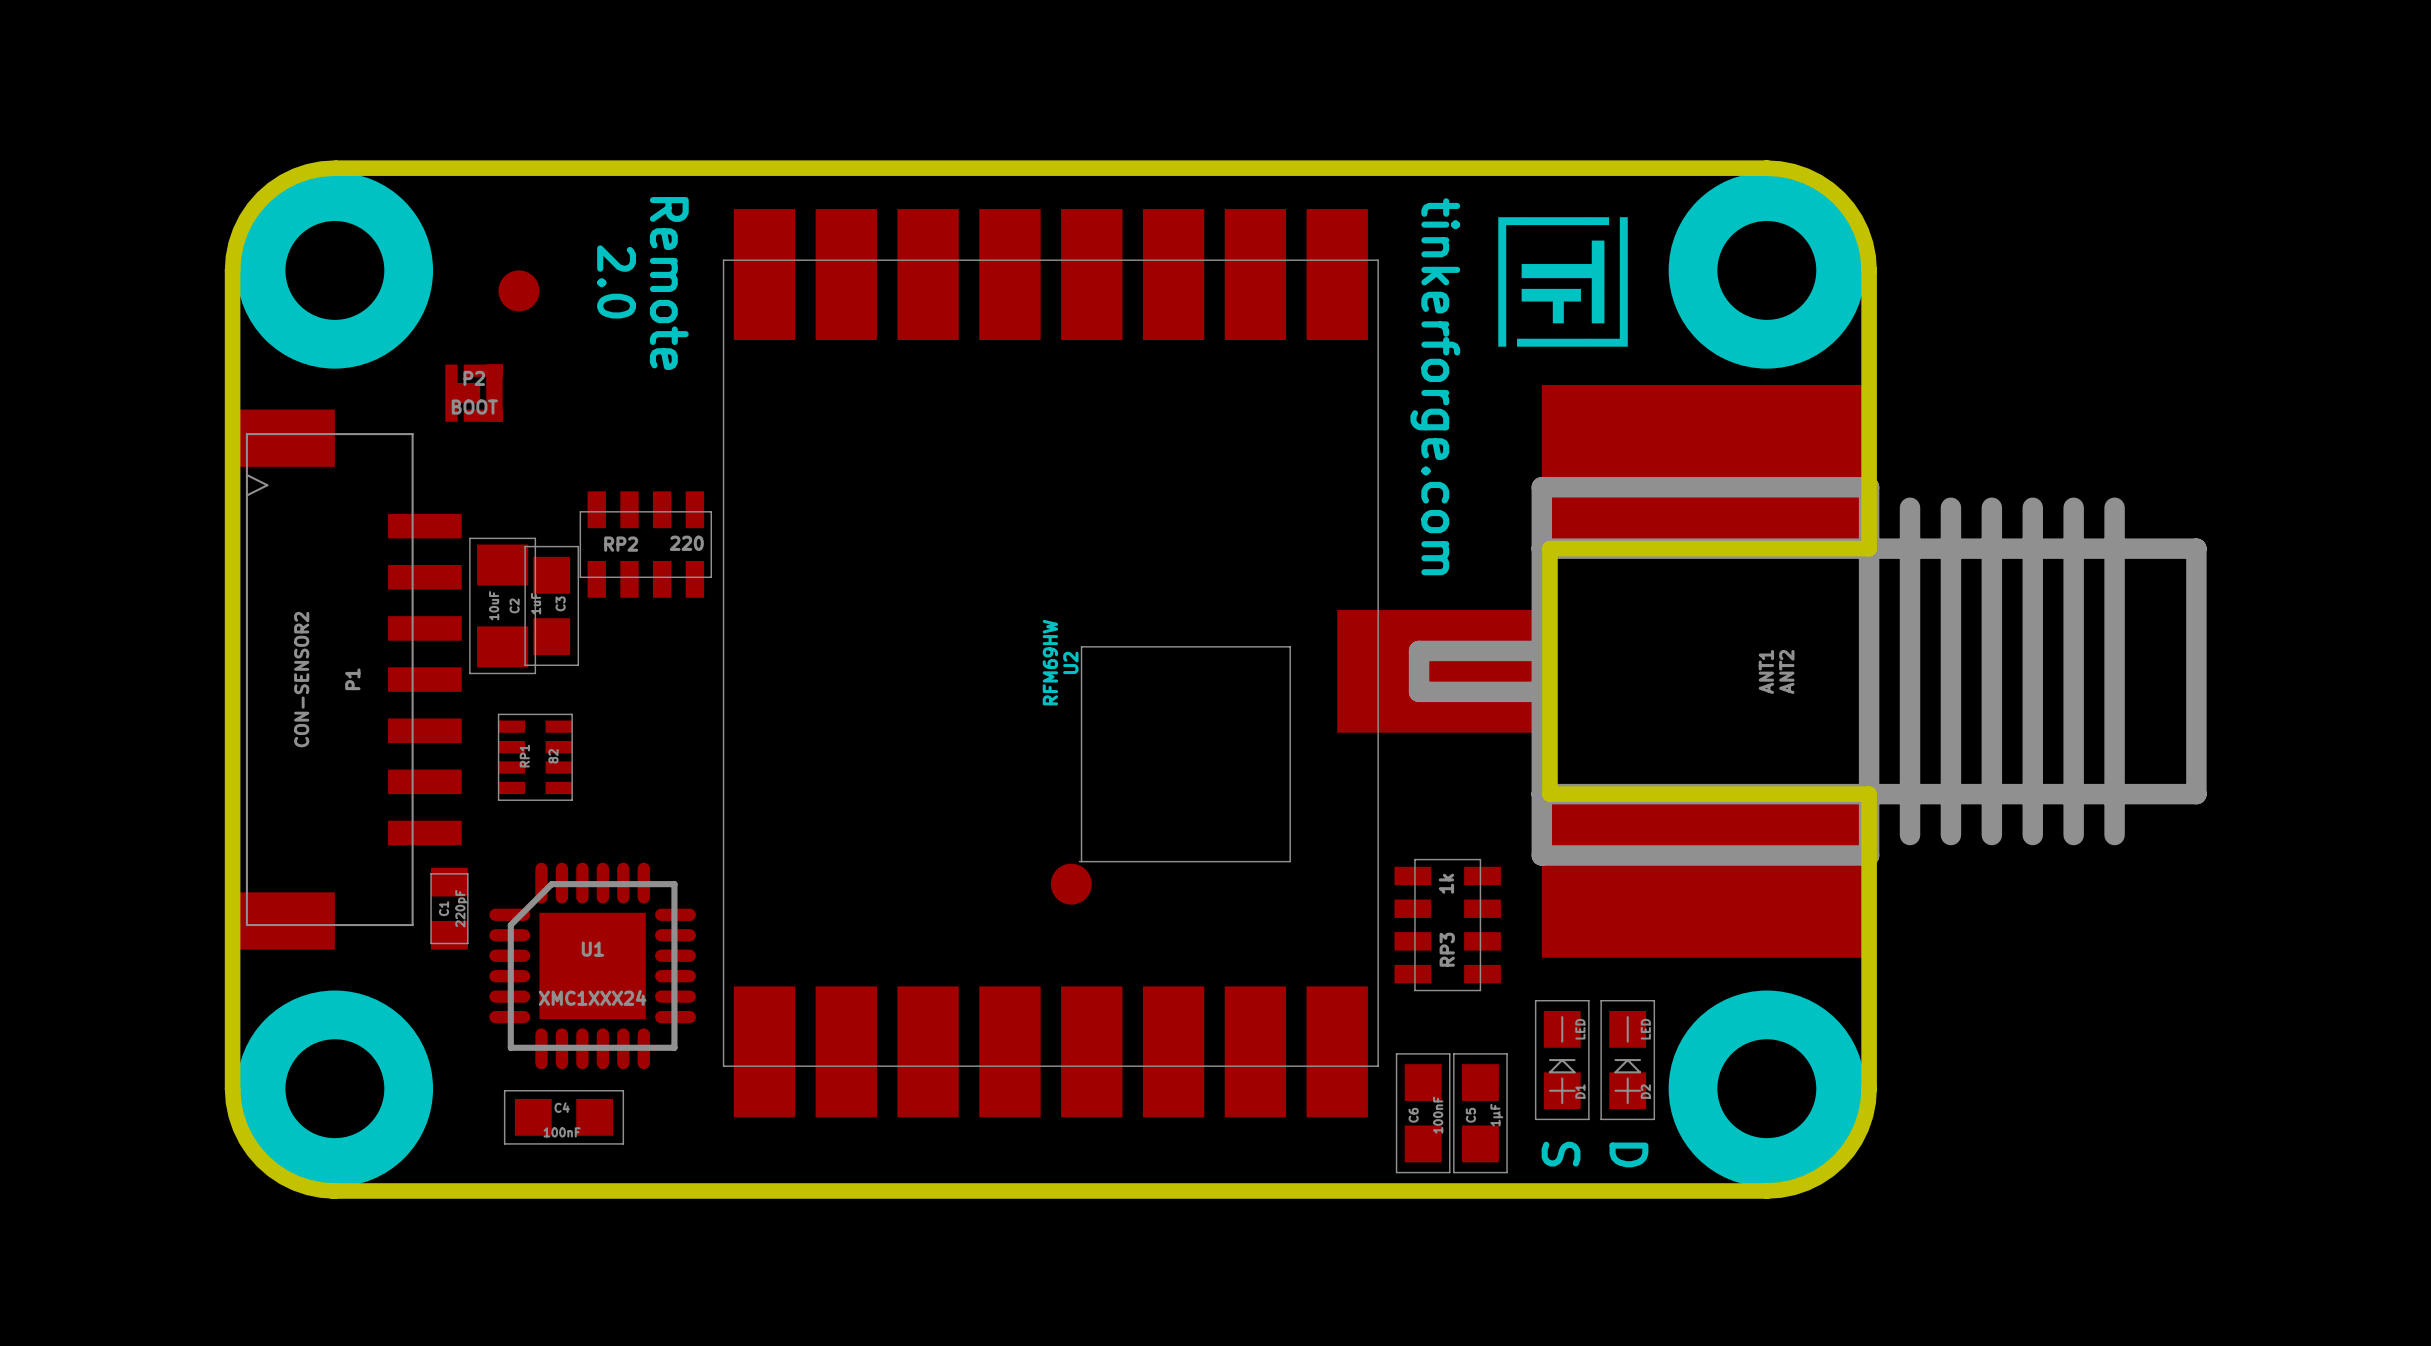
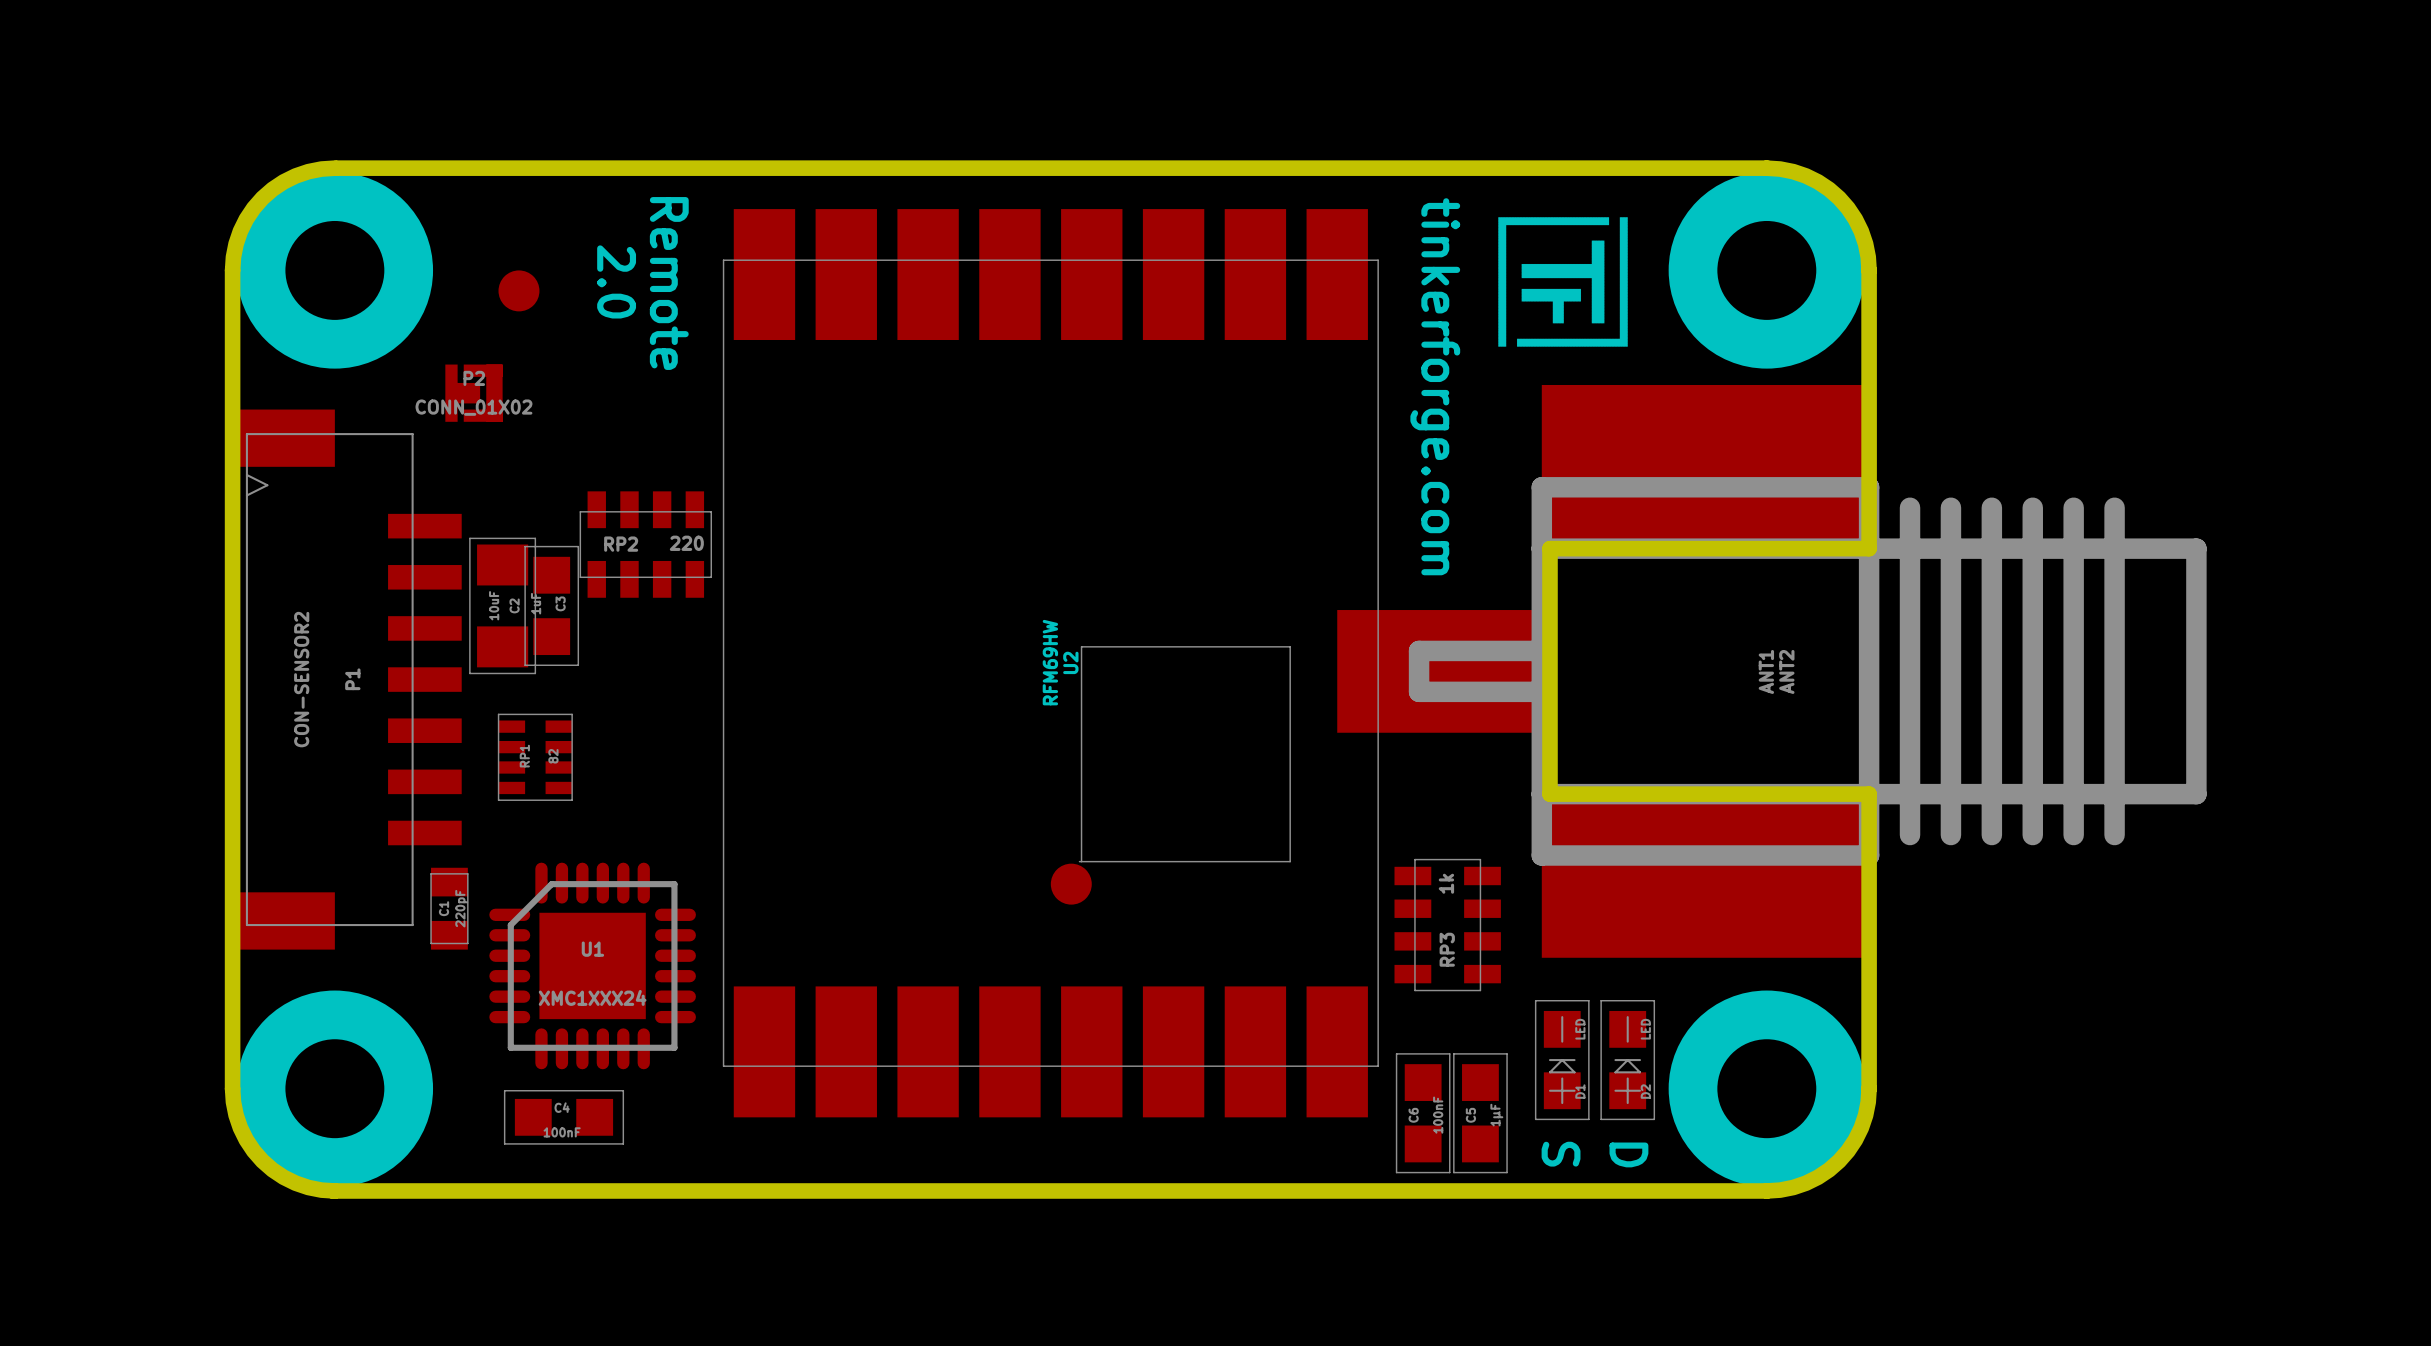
P2 value: BOOT (474, 407) -> CONN_01X02 (473, 407)

